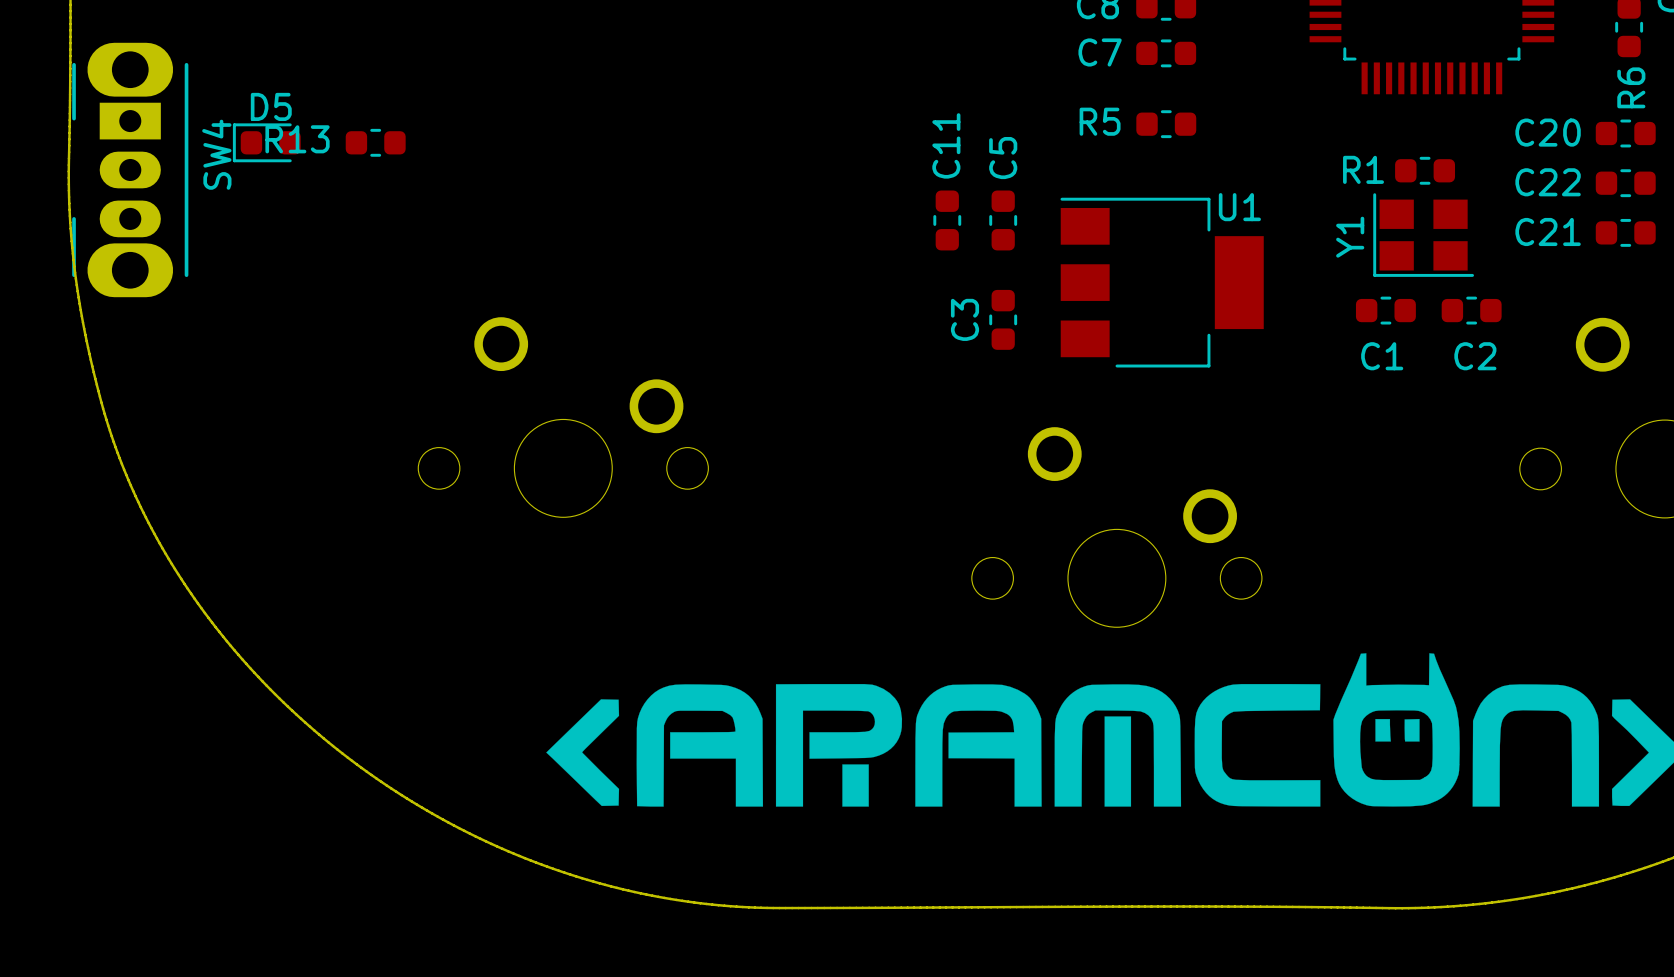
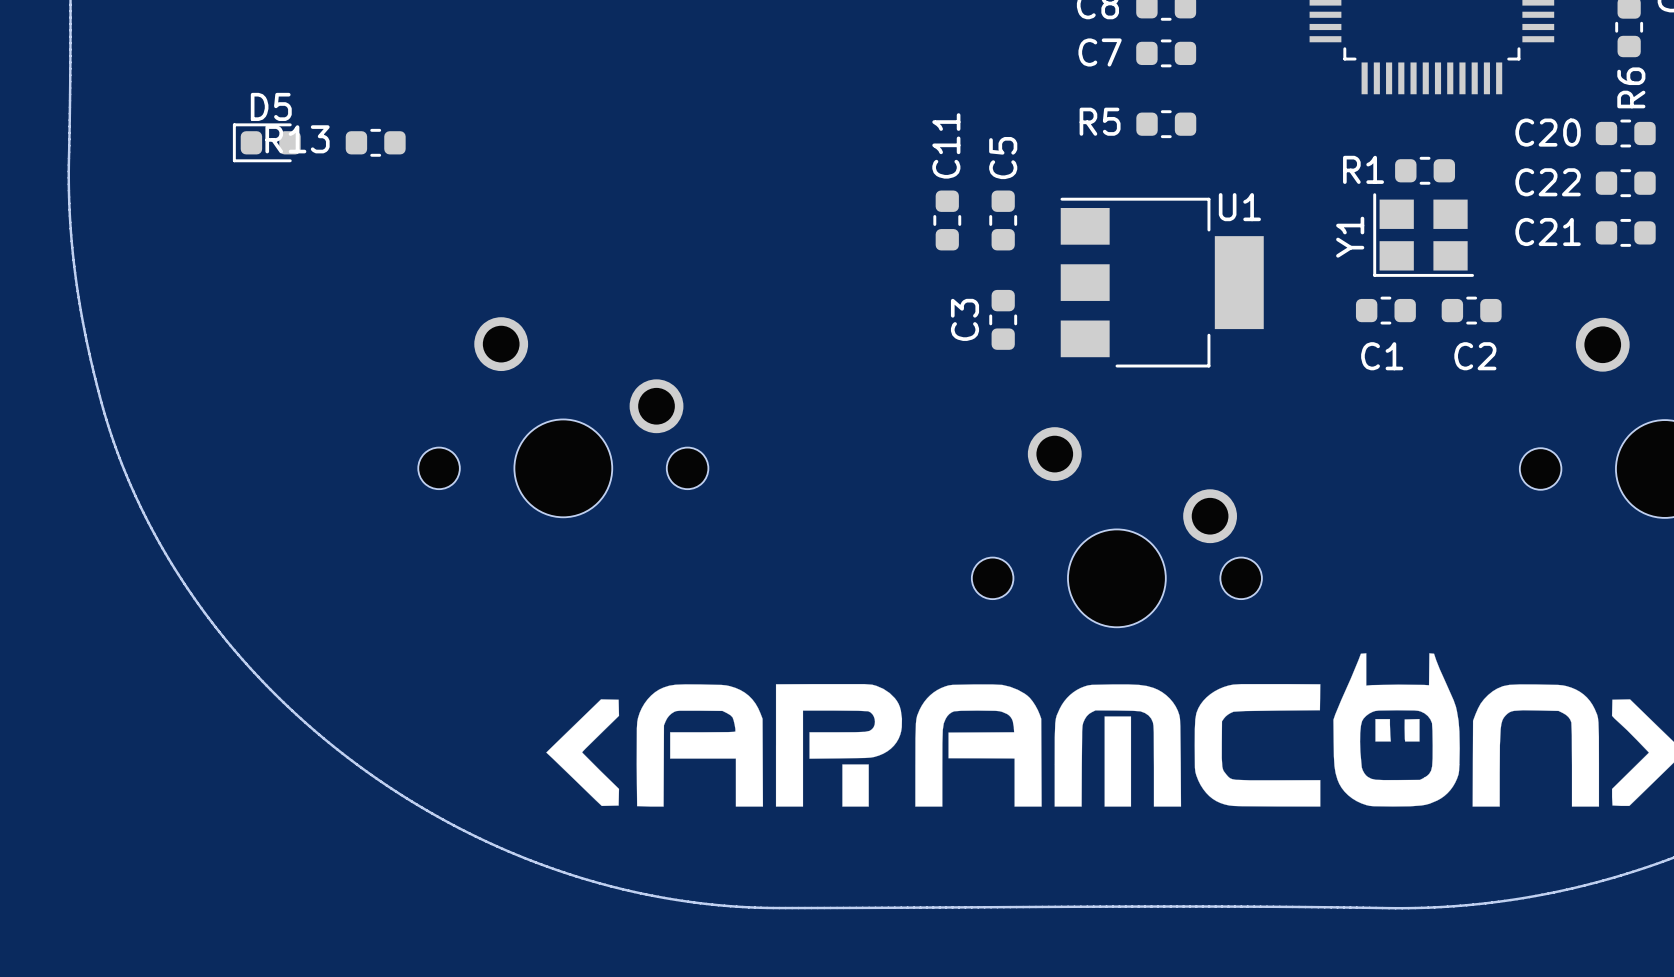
SW4: (130, 169) -> none

